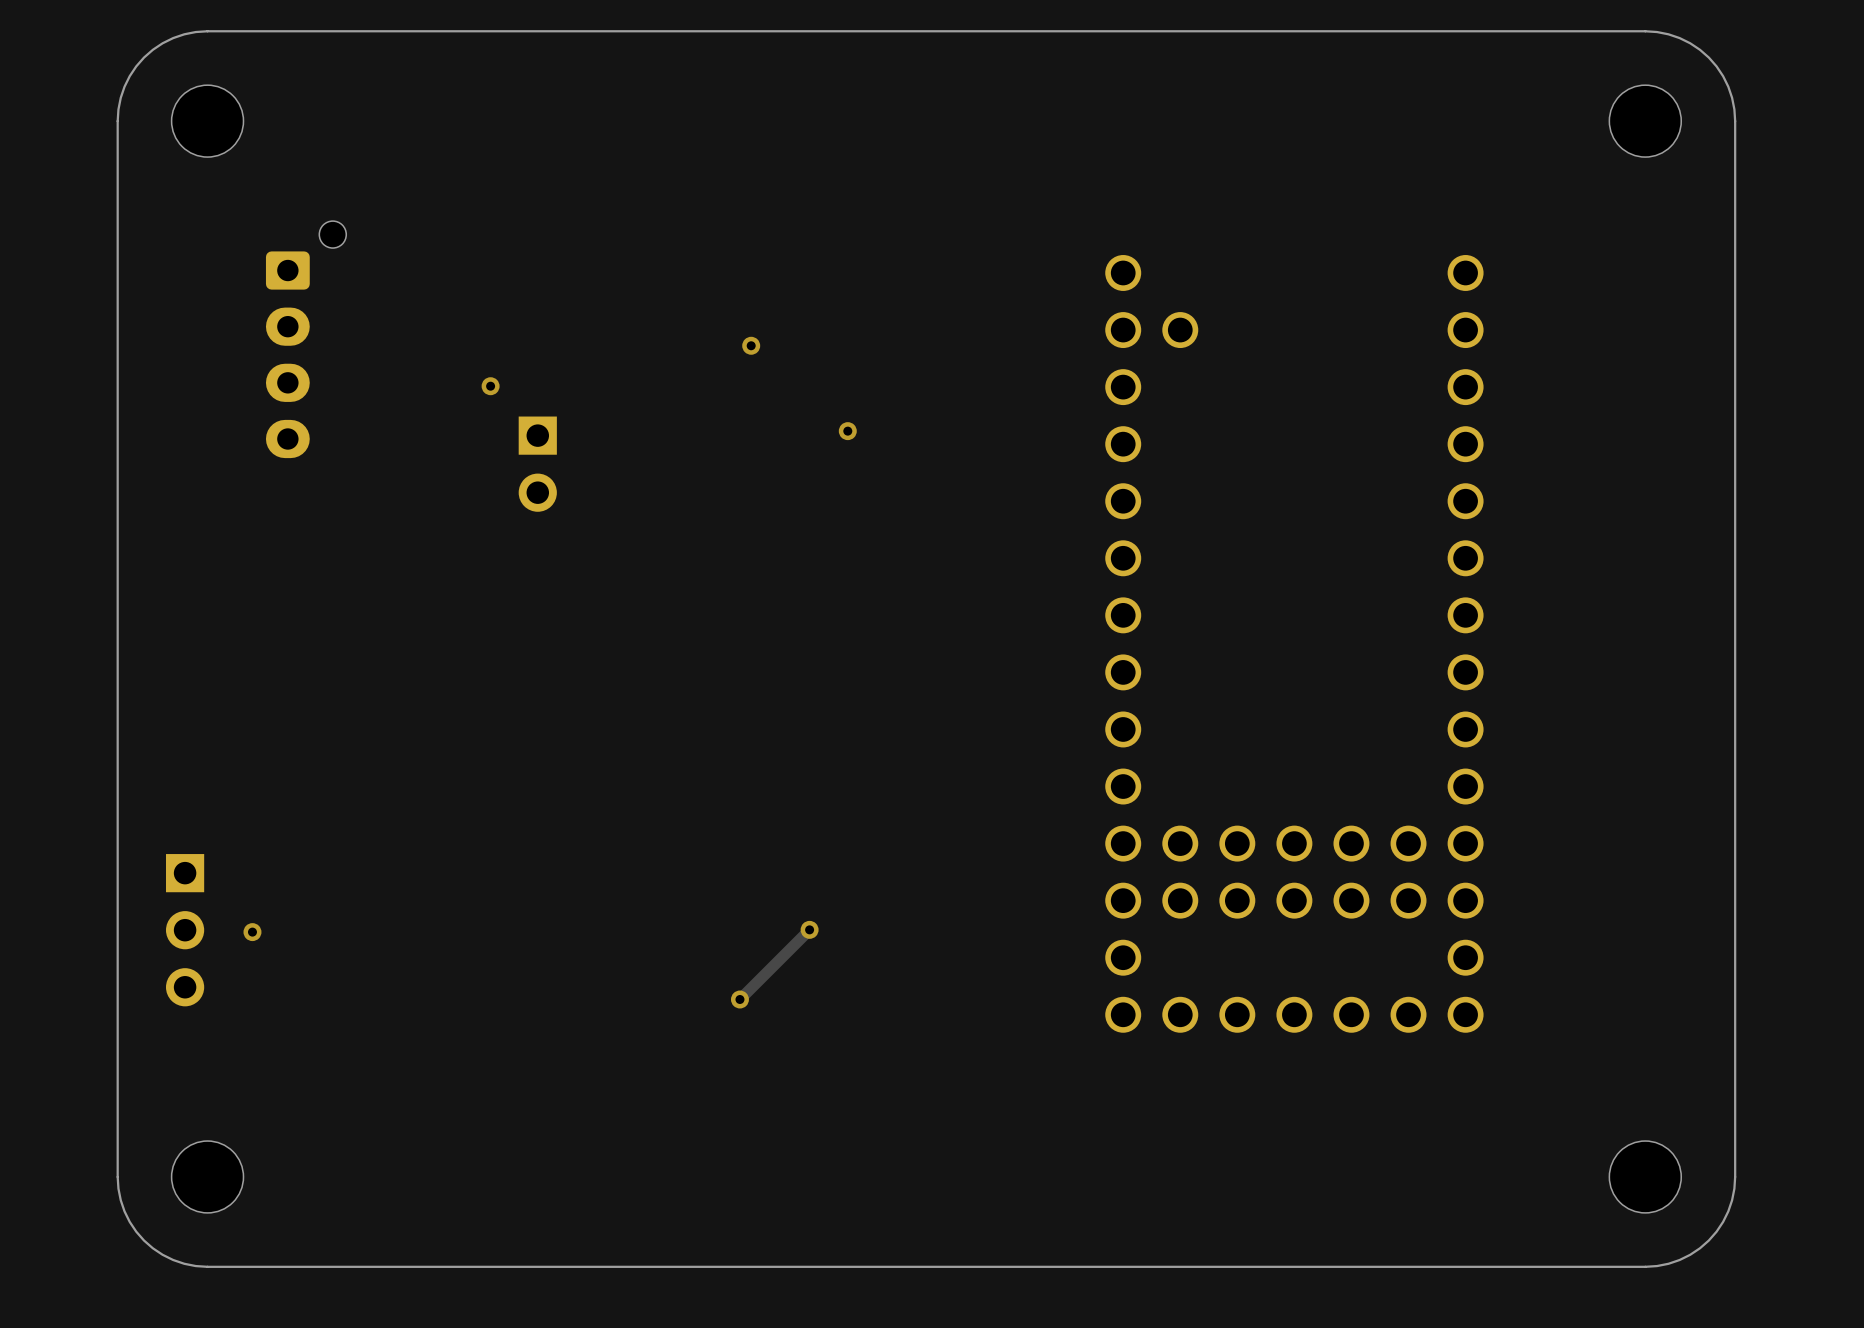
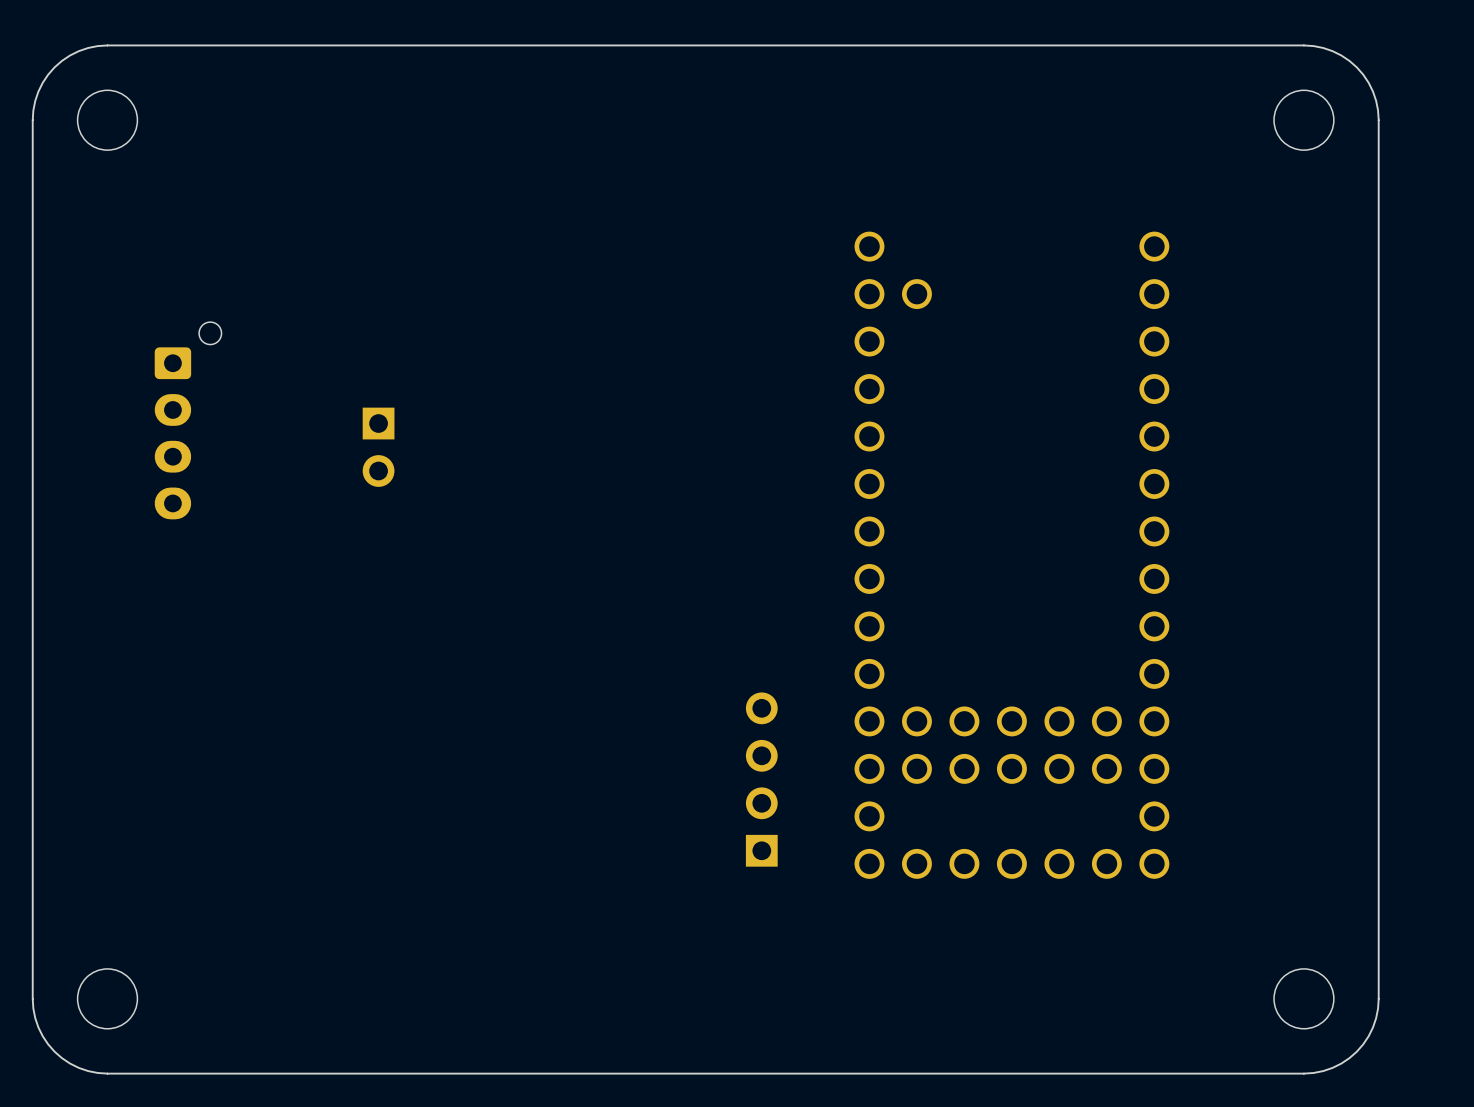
part position: (306, 339) -> (188, 420)
via: (751, 345) -> none
via: (490, 386) -> none
via: (847, 431) -> none
part position: (537, 464) -> (378, 447)
part: none -> (761, 779)
track: (809, 929) (739, 999) -> none
via: (809, 929) -> none
part: (185, 930) -> none
via: (252, 932) -> none
via: (739, 999) -> none

